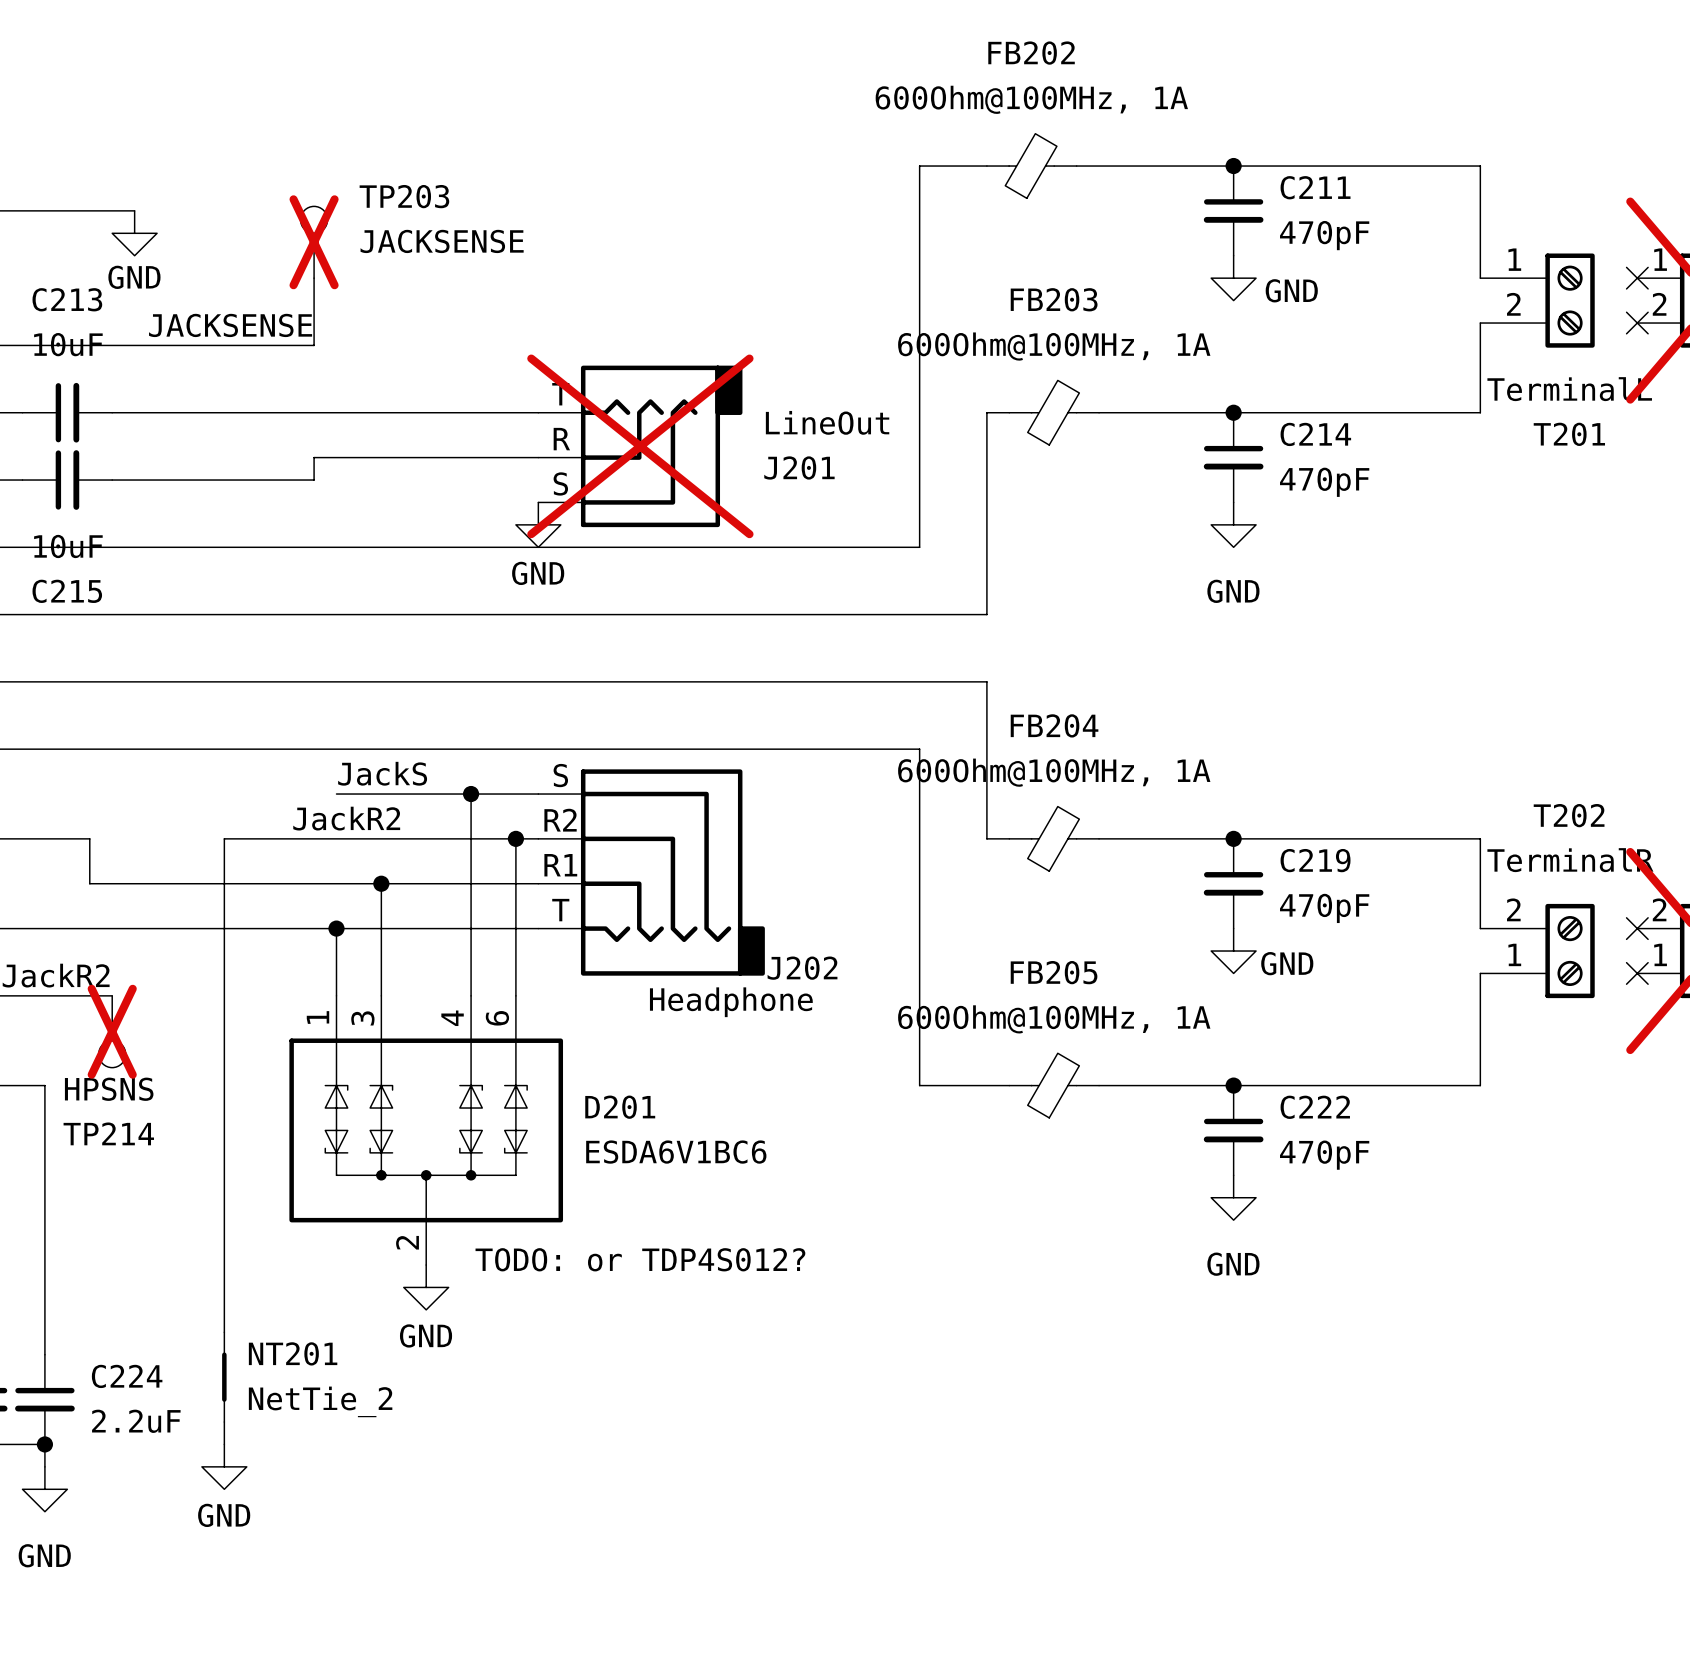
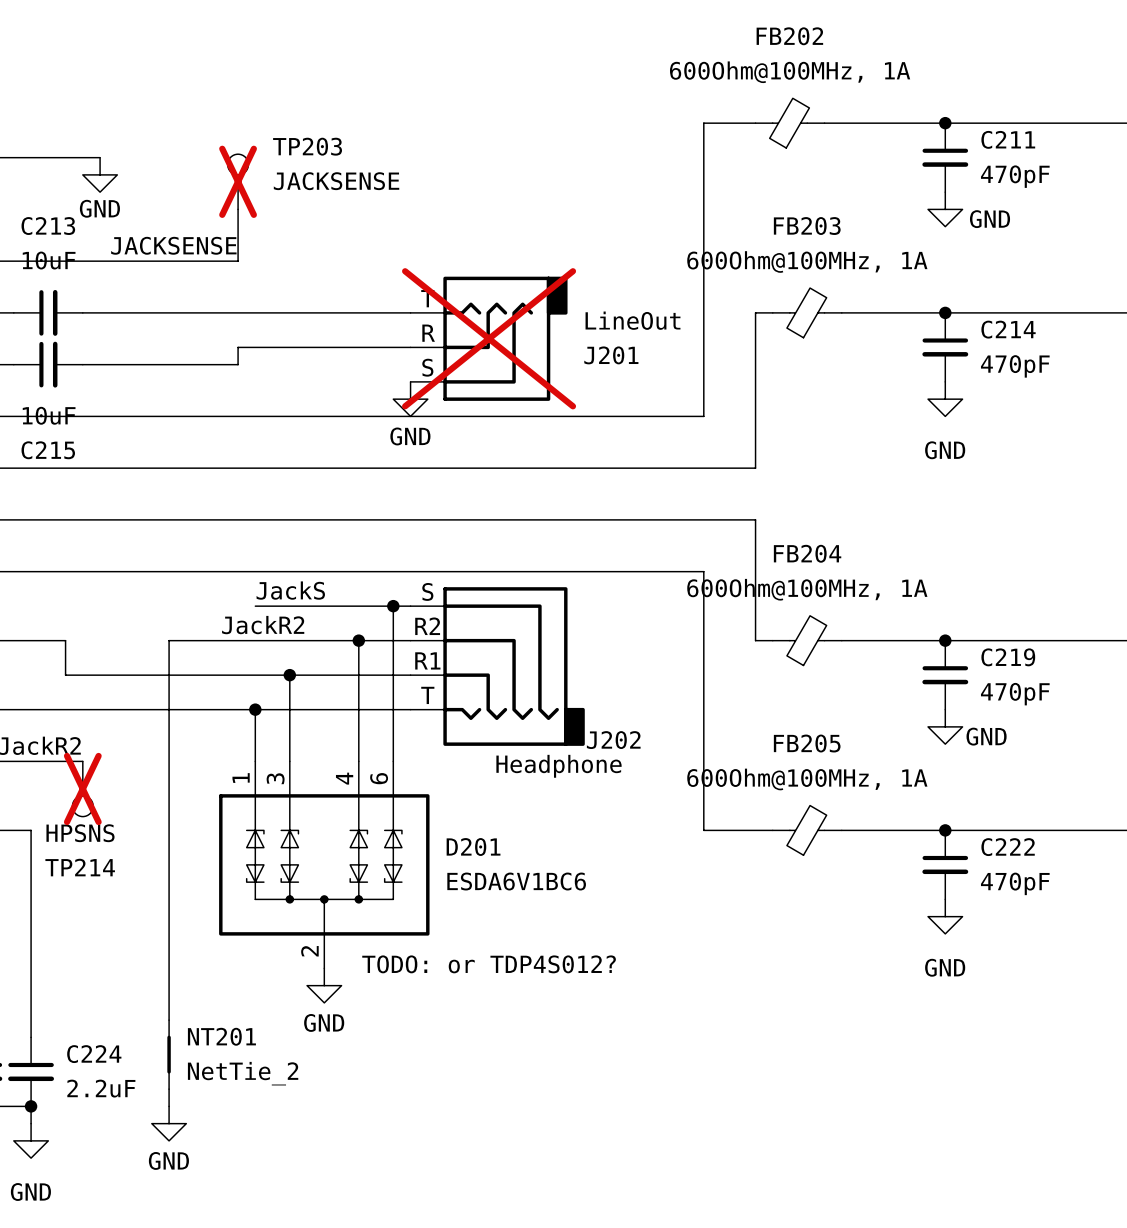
wire: (471, 794) (471, 838) -> (393, 606) (393, 640)
junction: (471, 794) -> none
junction: none -> (393, 606)
junction: none -> (358, 640)
junction: (515, 838) -> none

